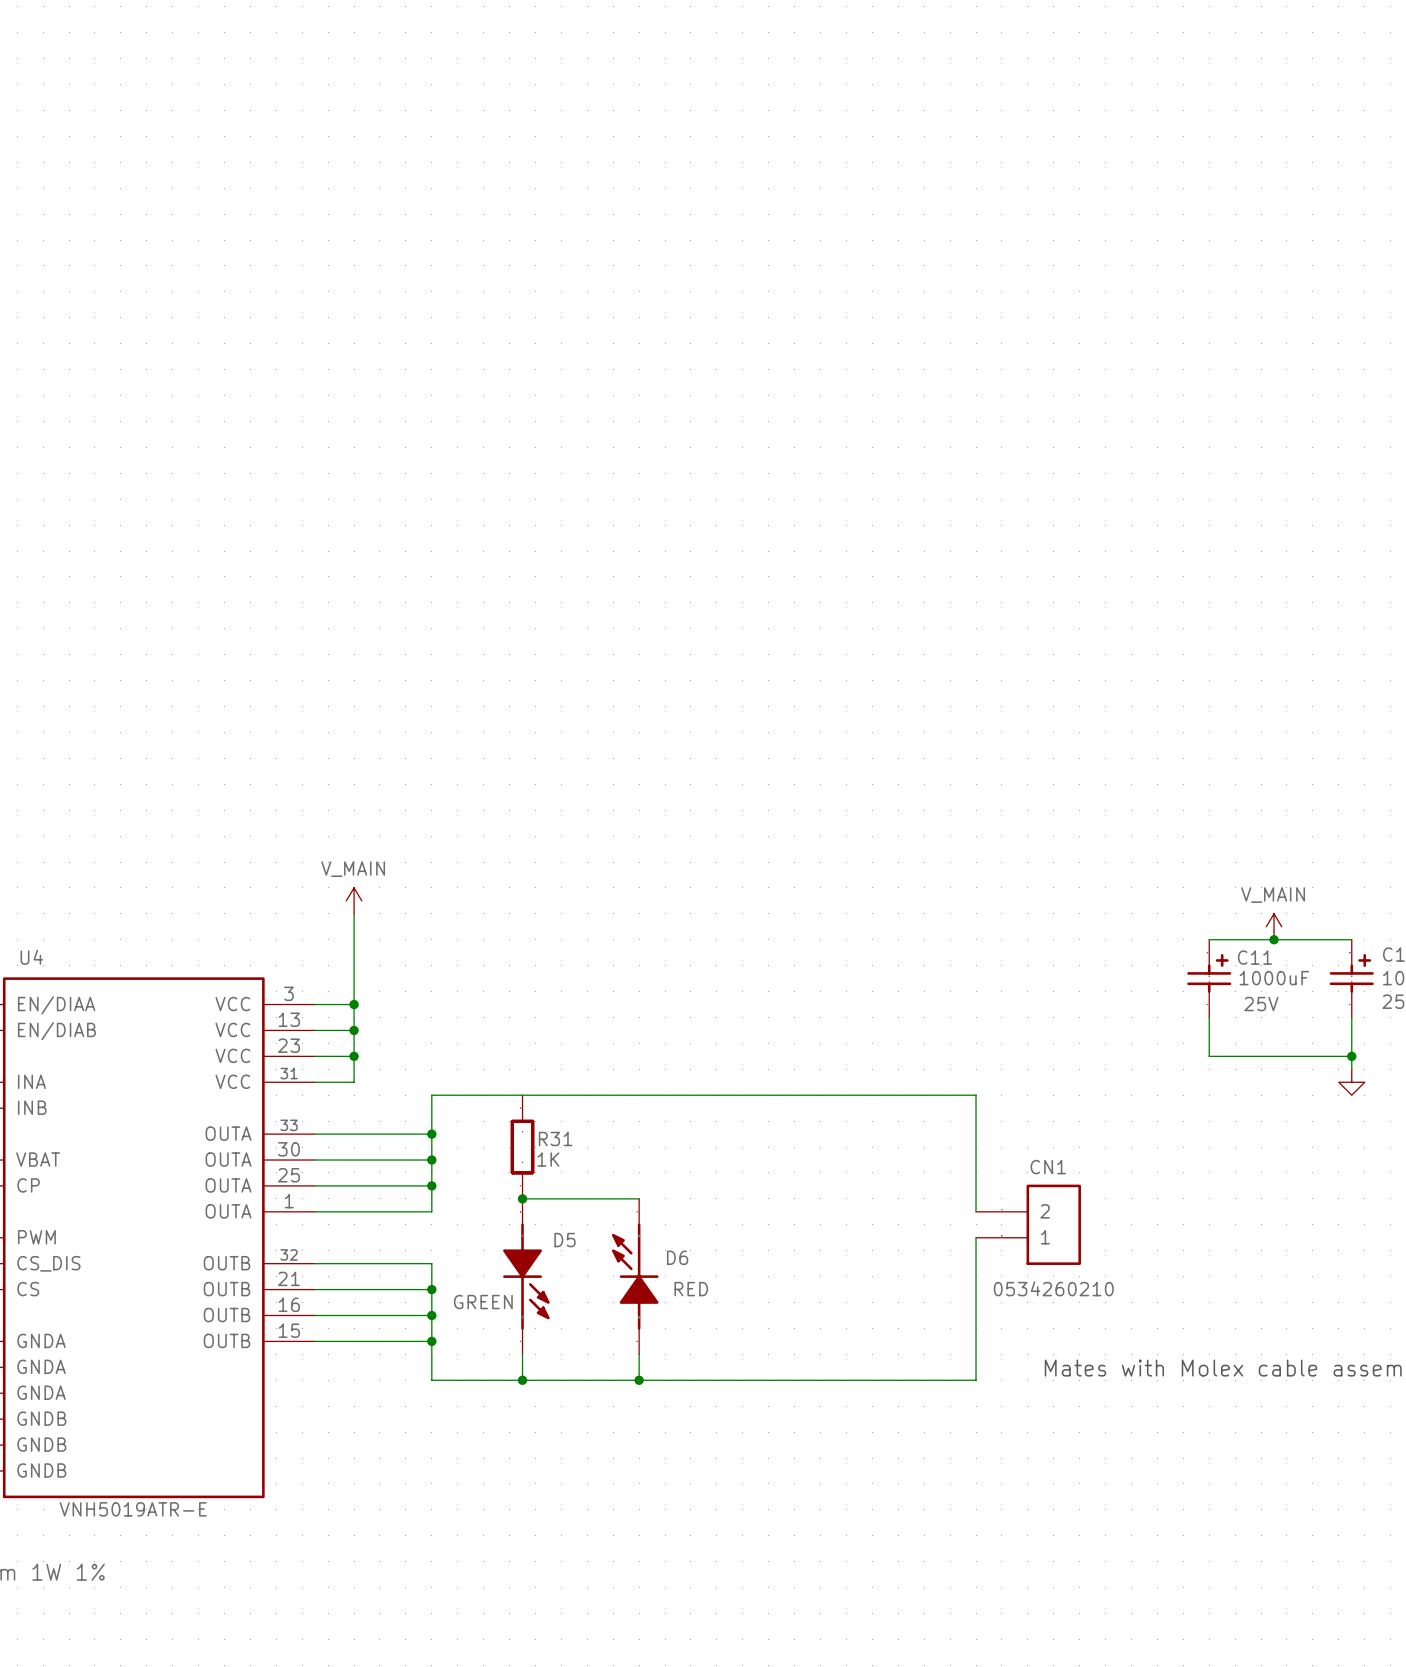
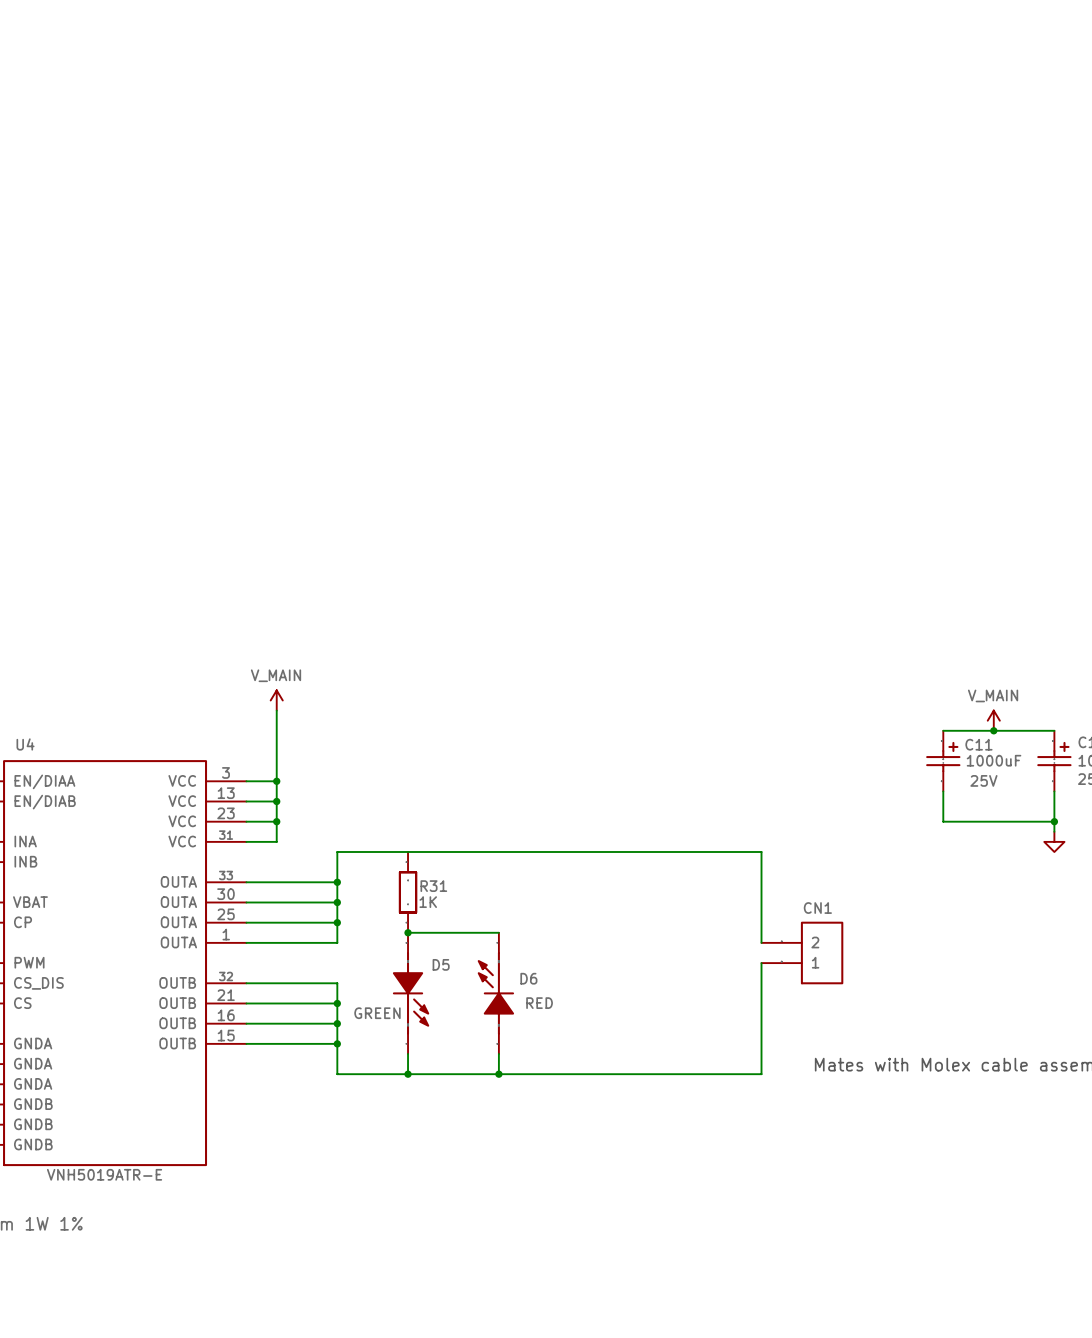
CN1 text: 0534260210 (1053, 1288) -> none

